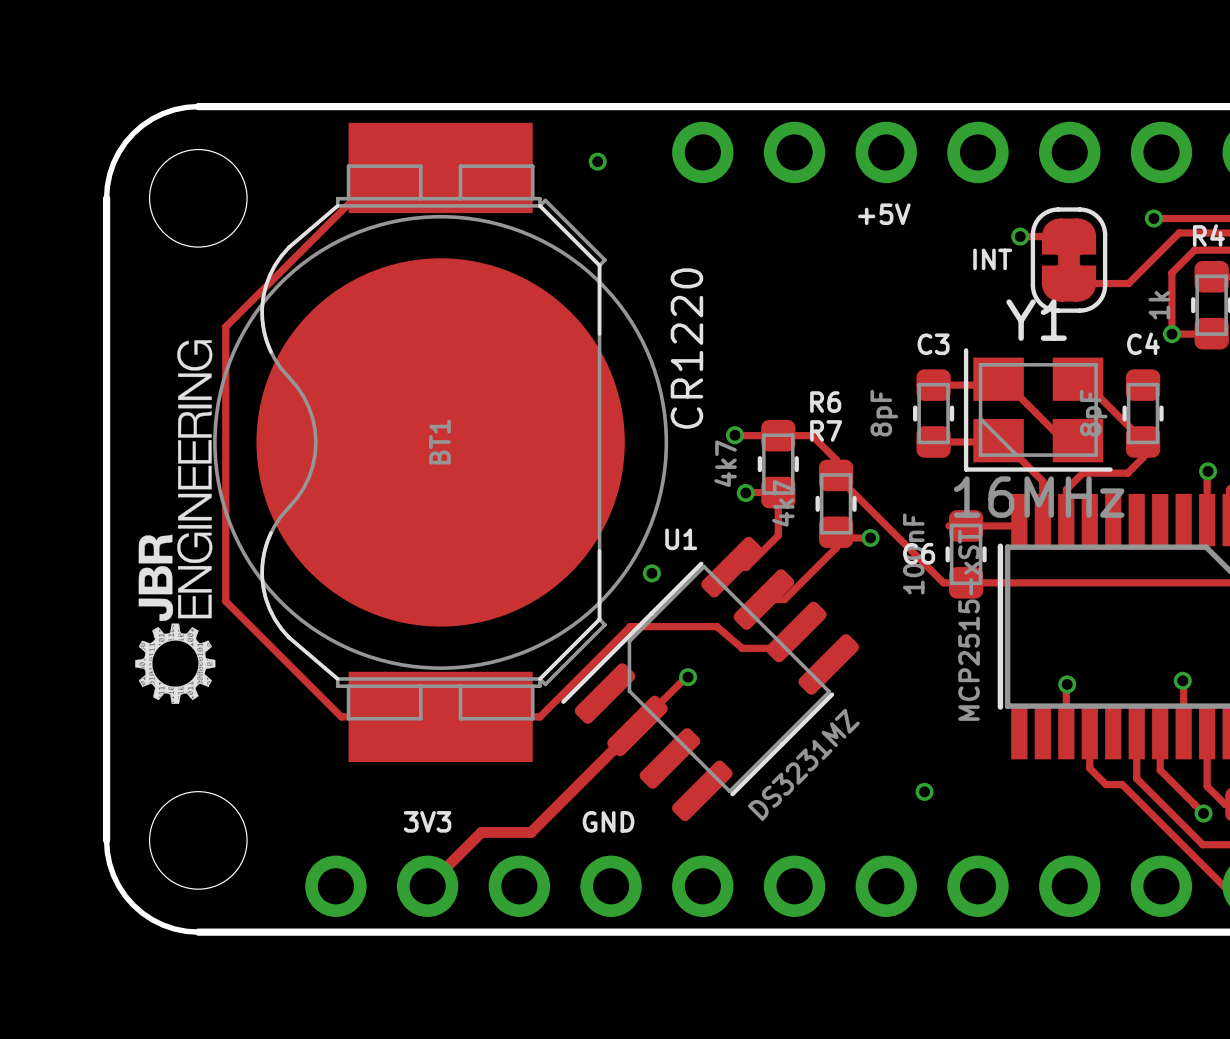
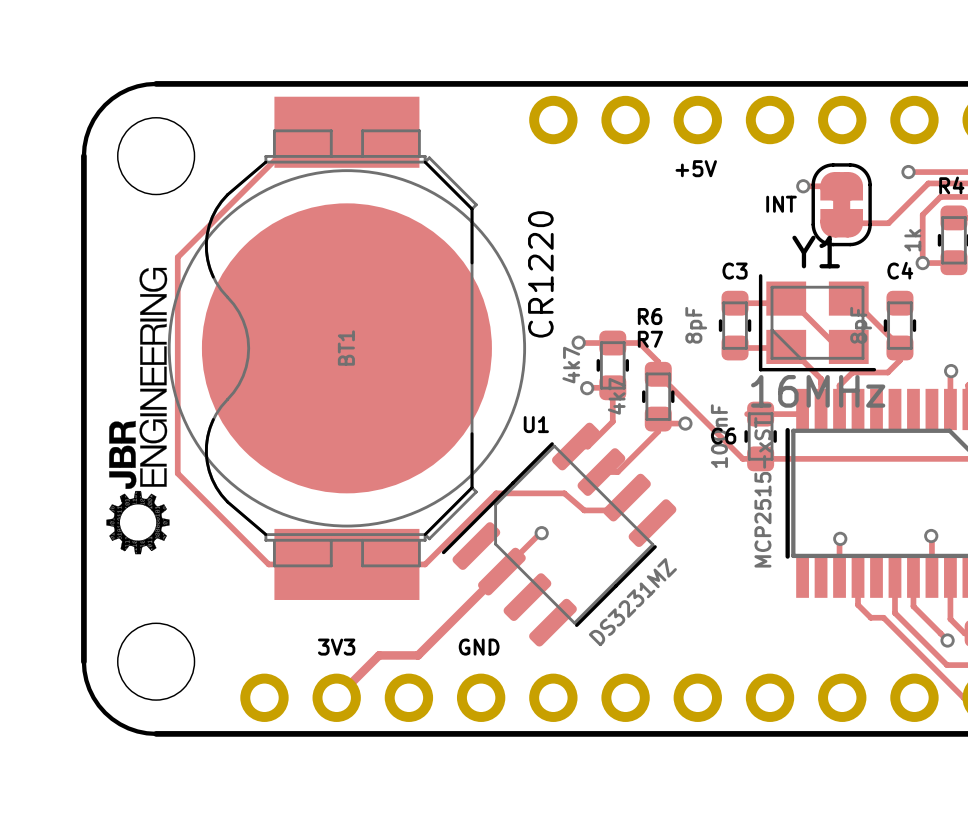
via: (597, 161) -> none
via: (651, 573) -> none
via: (924, 791) -> none

